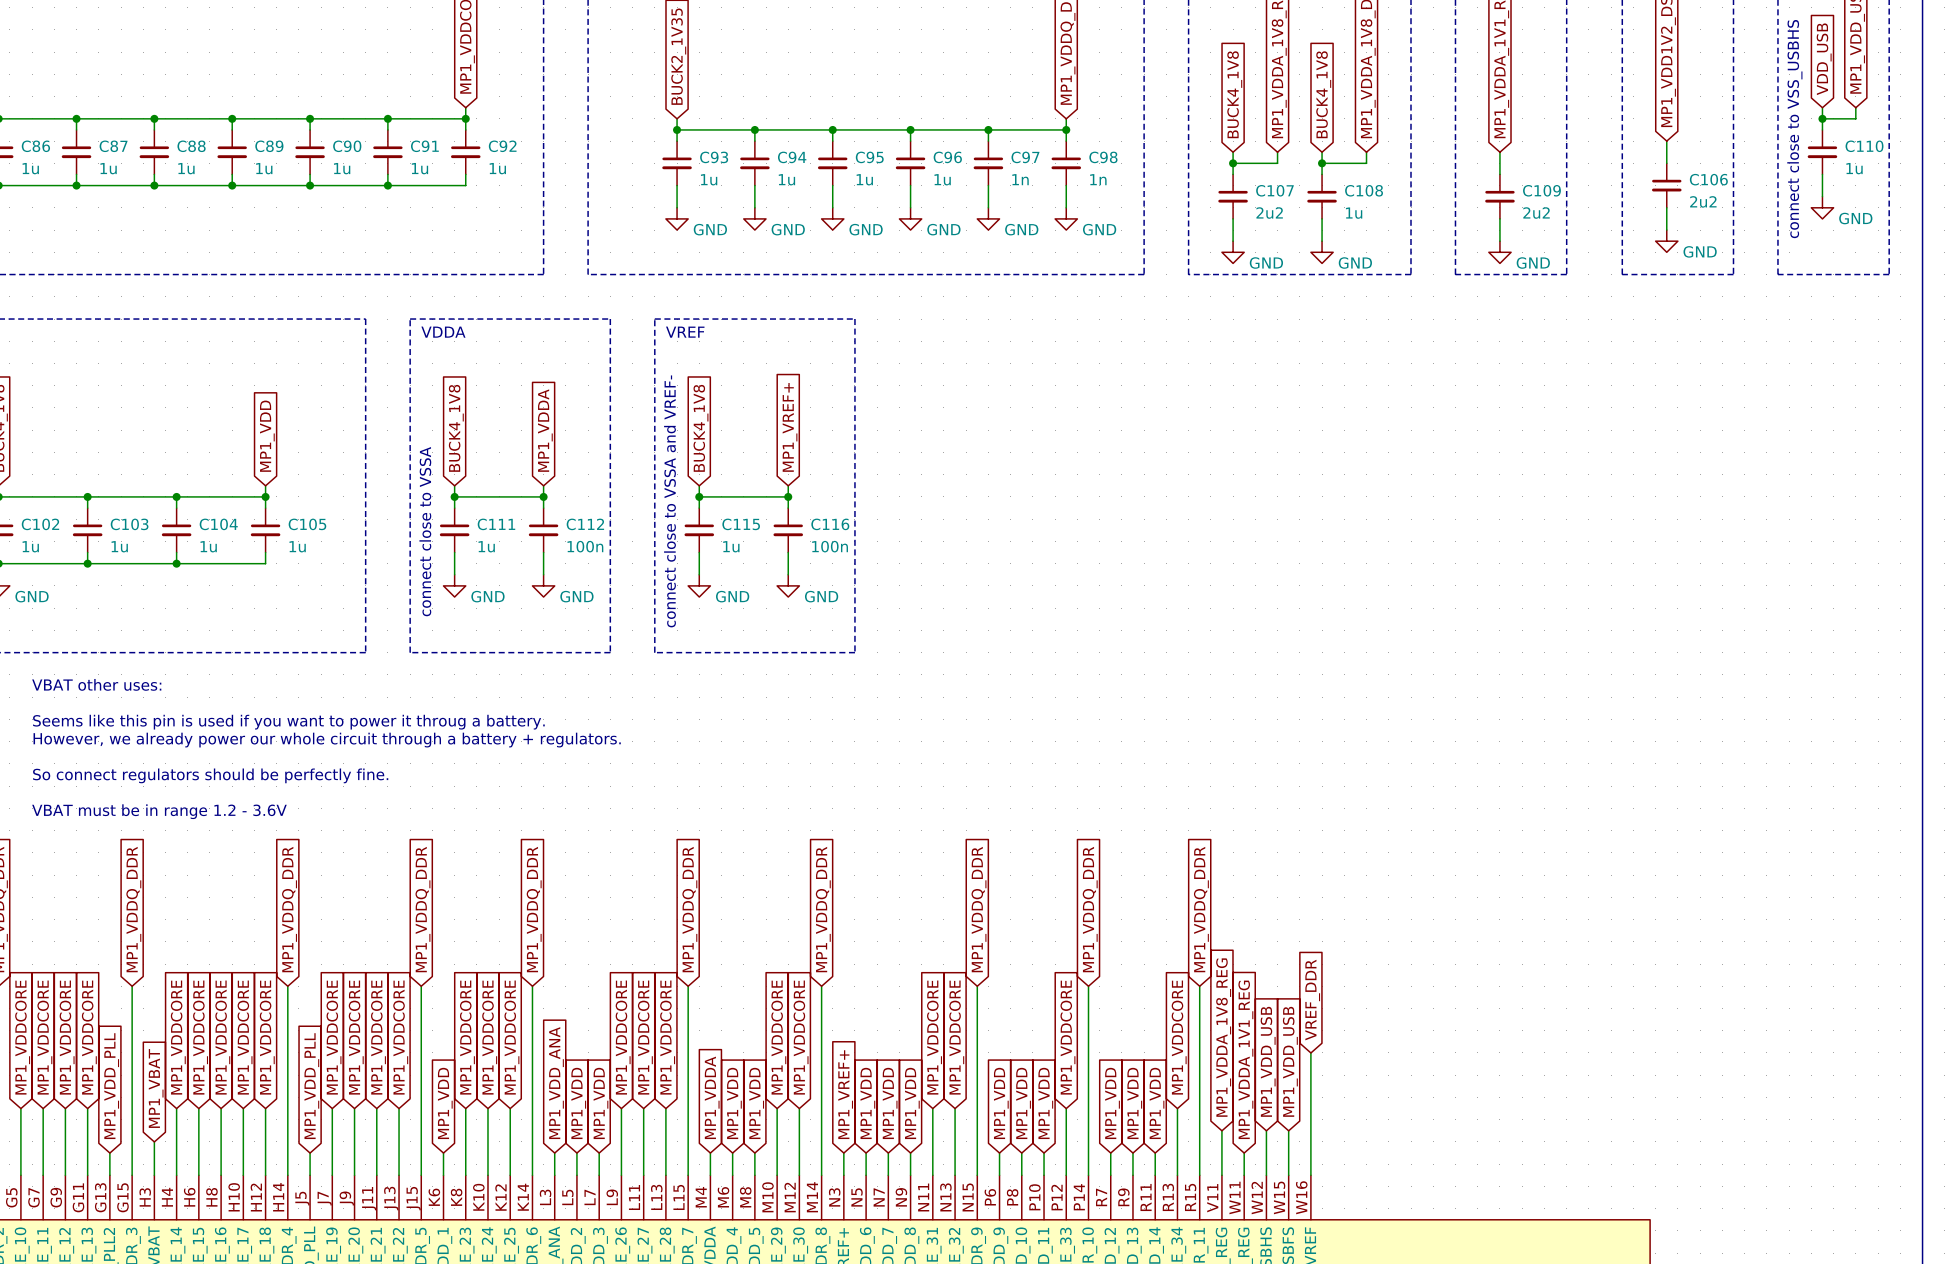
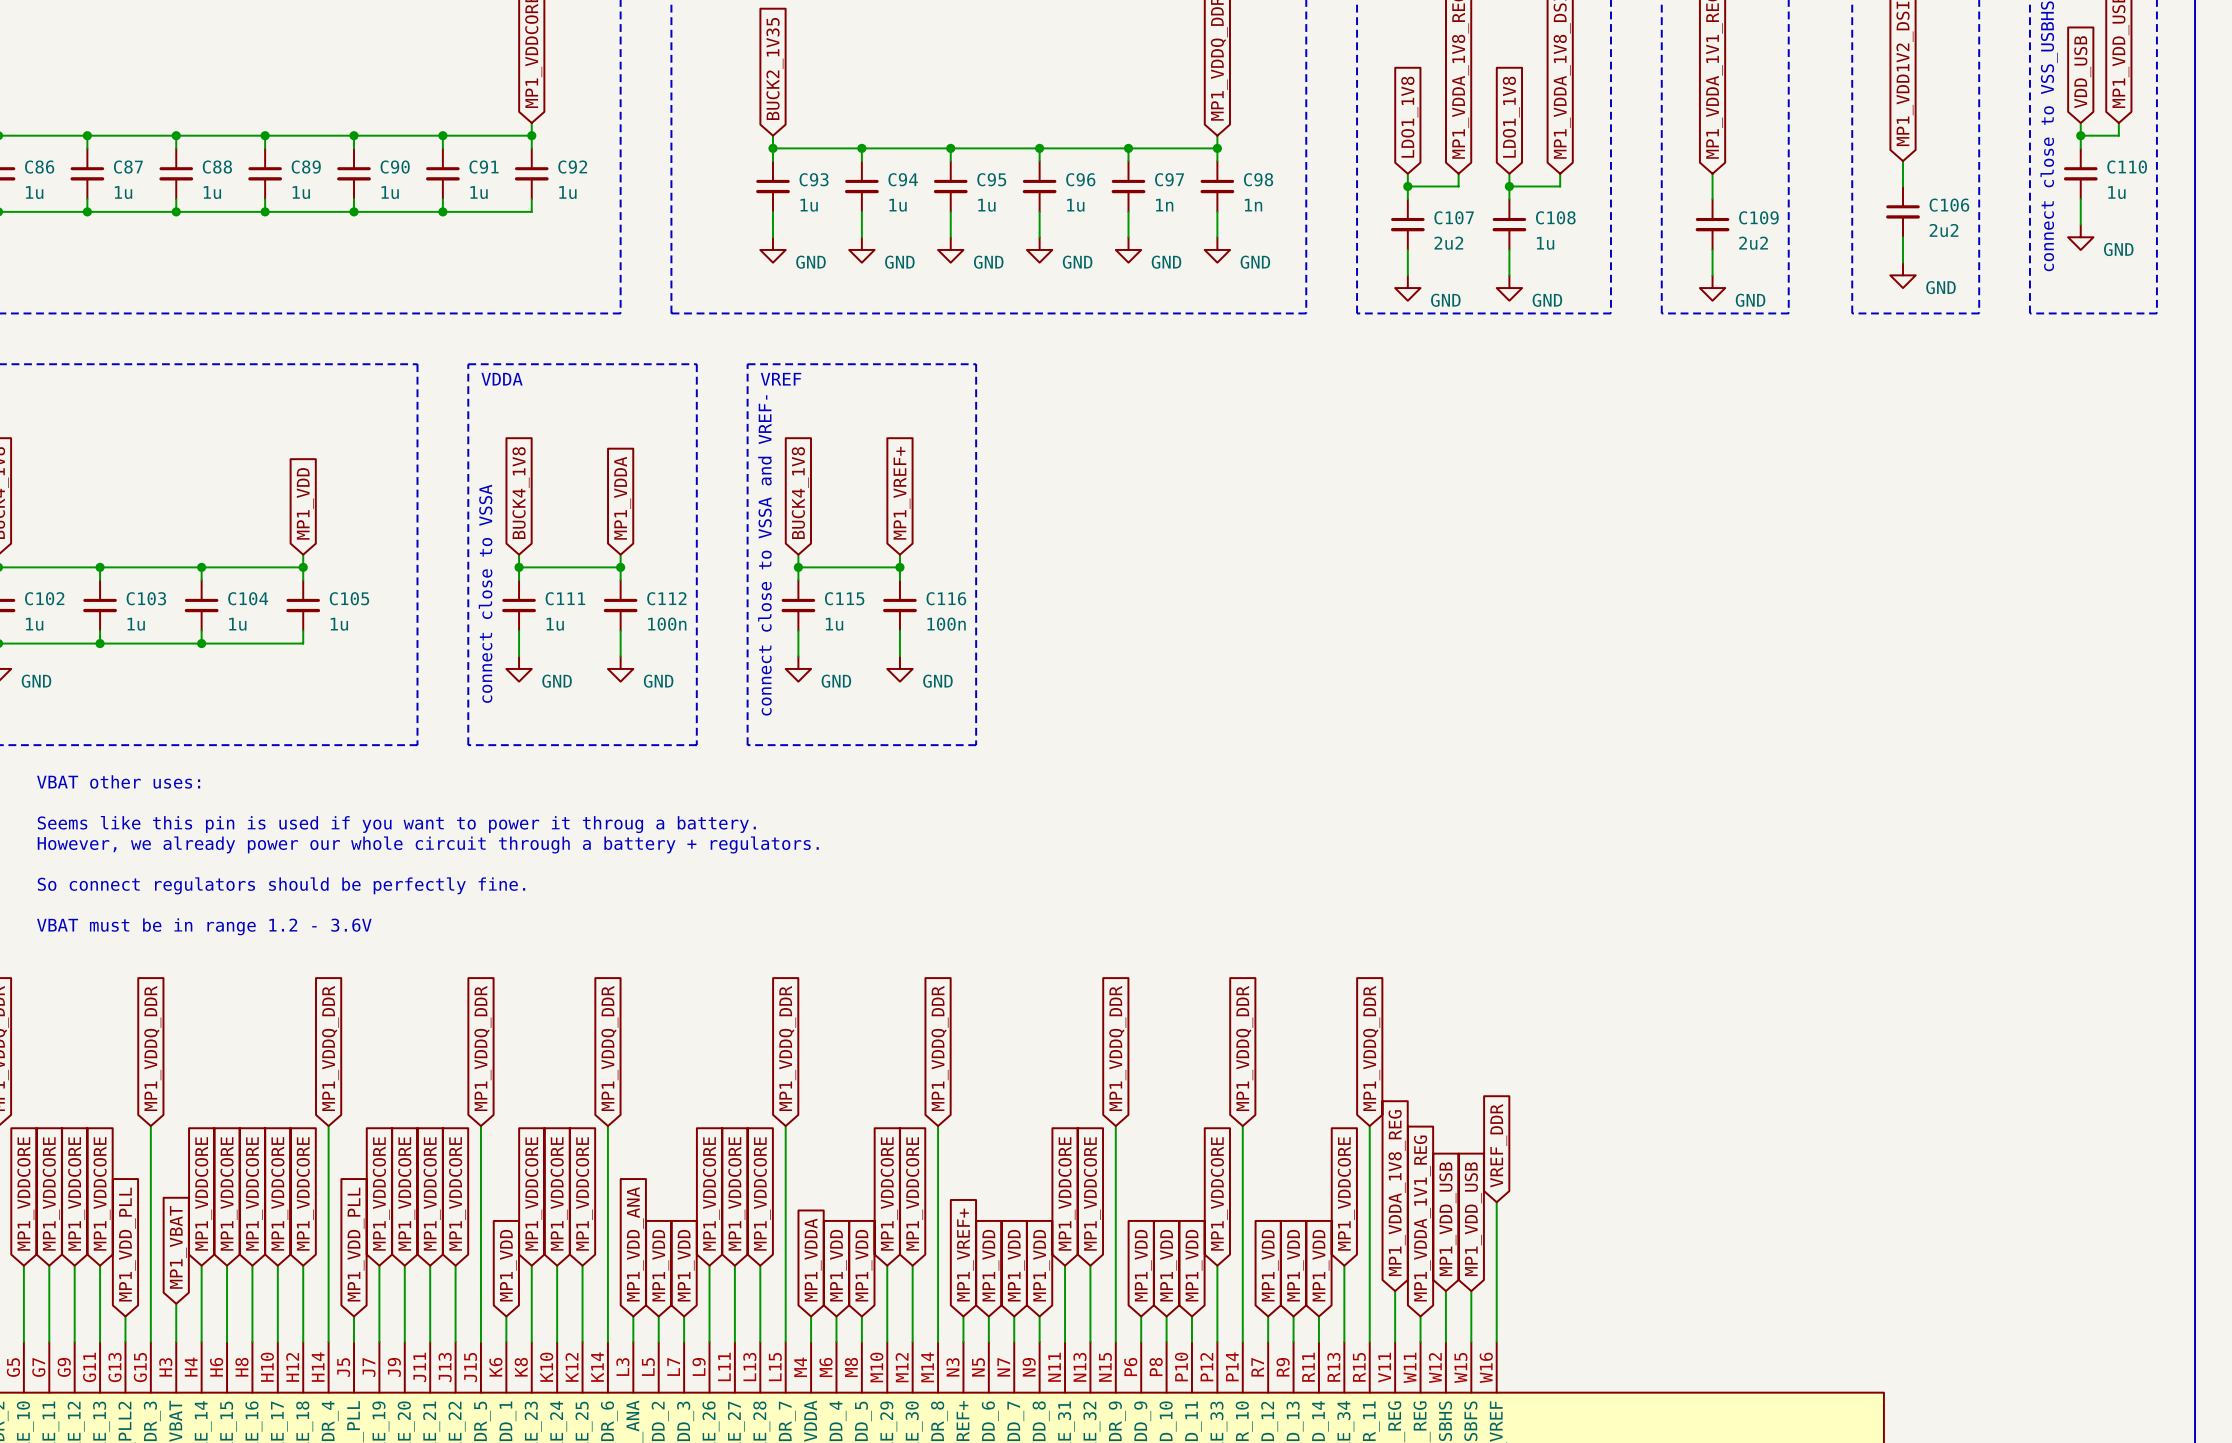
global label: BUCK4_1V8 (1234, 94) -> LDO1_1V8 (1409, 117)
global label: BUCK4_1V8 (1323, 94) -> LDO1_1V8 (1511, 117)

